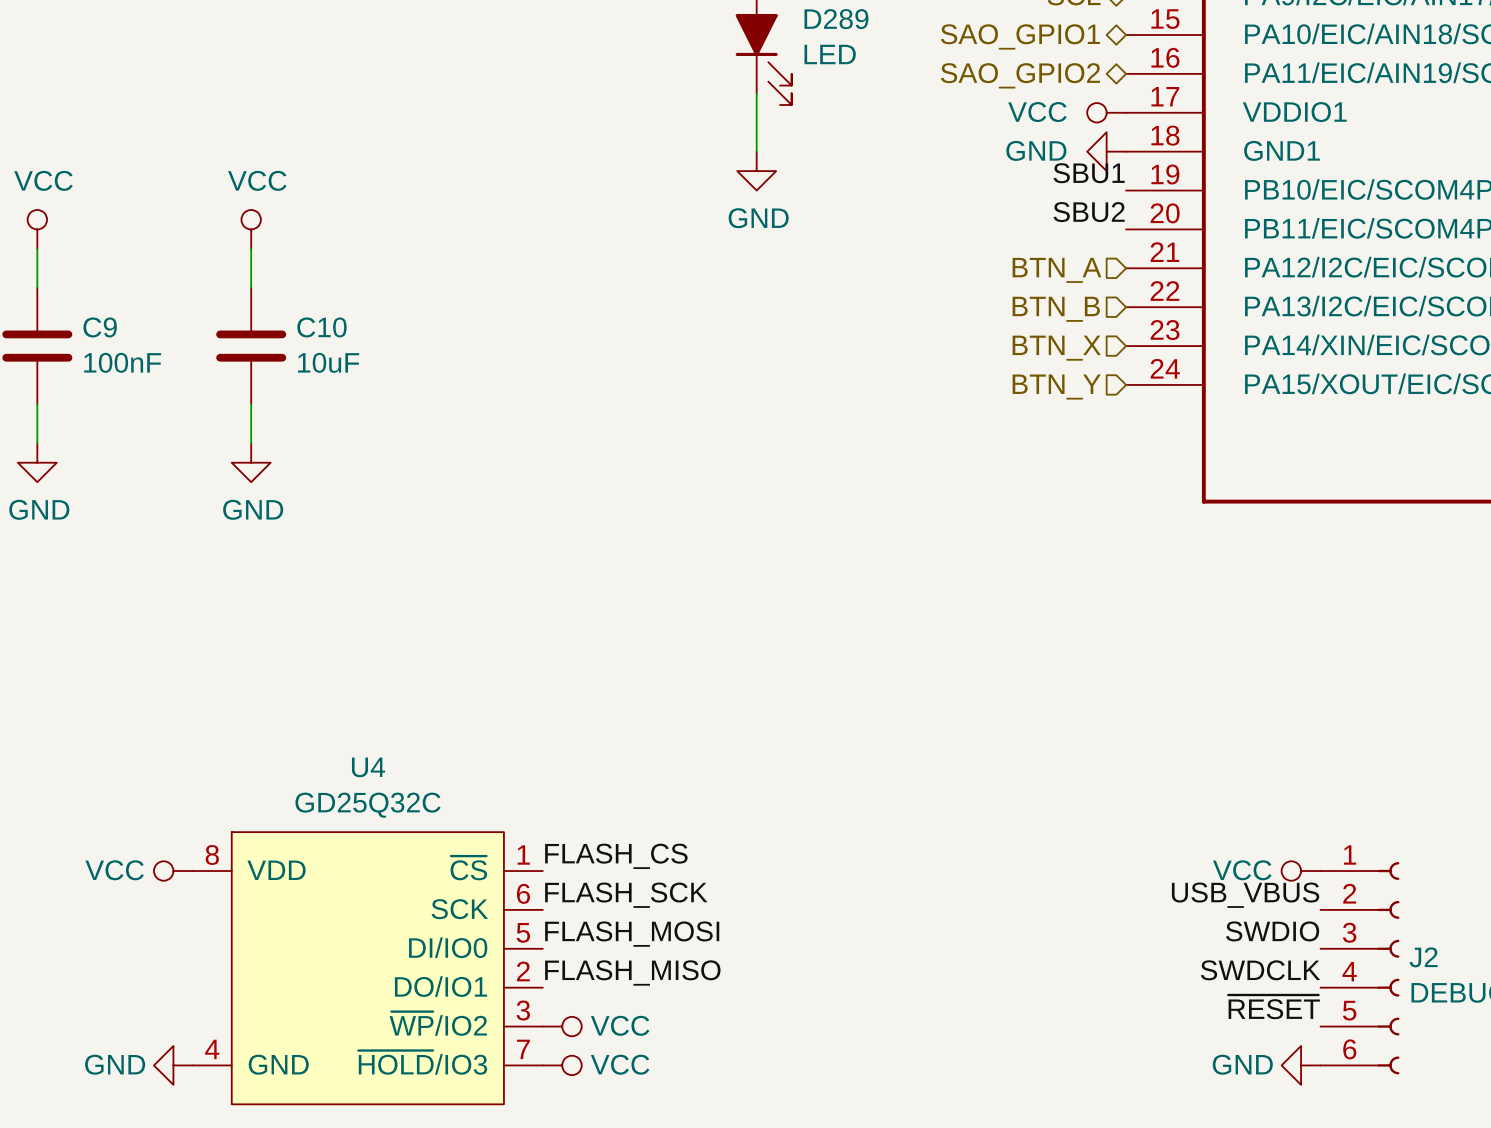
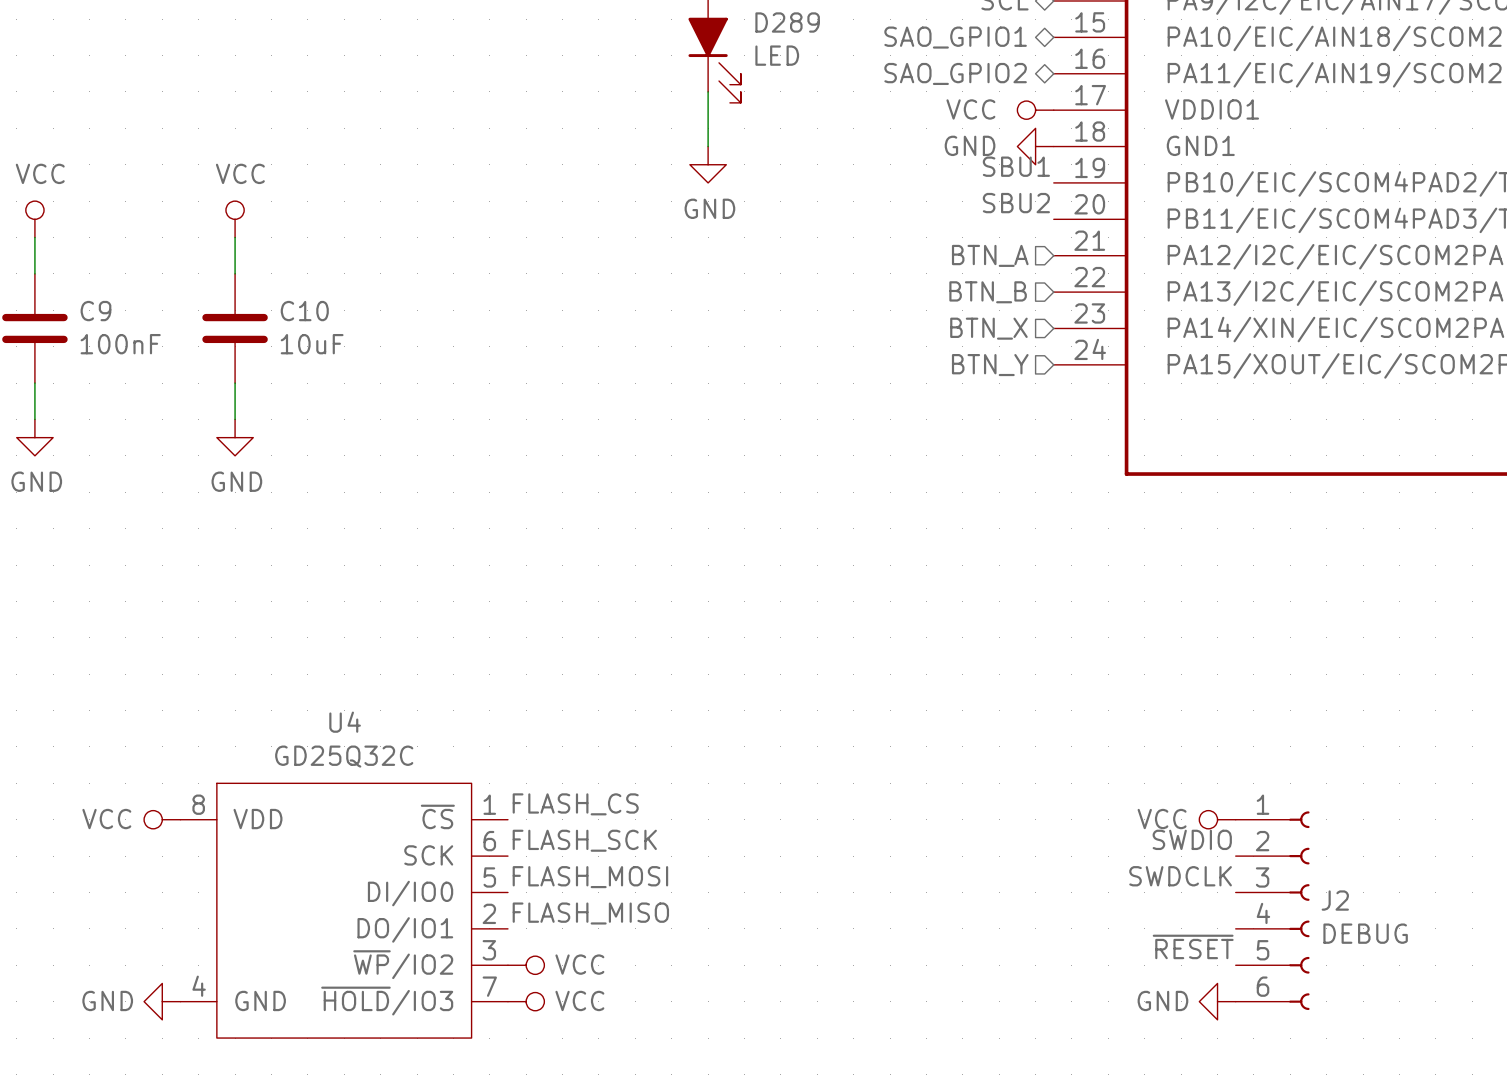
label: USB_VBUS (1245, 895) -> SWDIO (1192, 839)
label: SWDIO (1272, 931) -> SWDCLK (1180, 876)
label: SWDCLK (1260, 970) -> none

